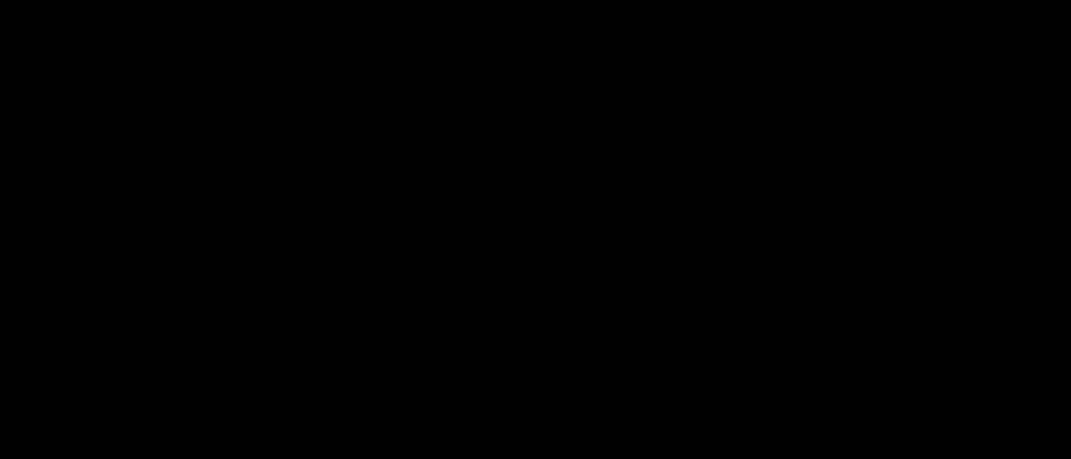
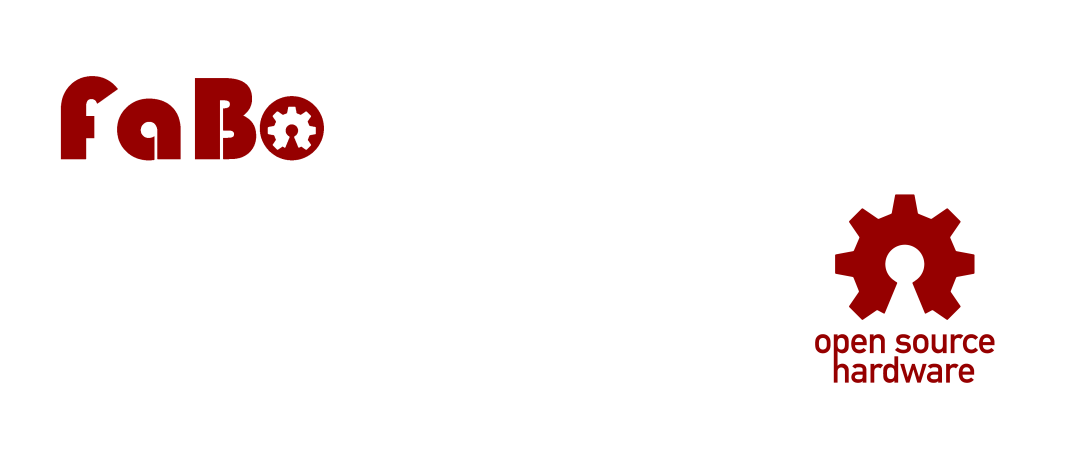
part: none -> (192, 118)
part: none -> (904, 288)

